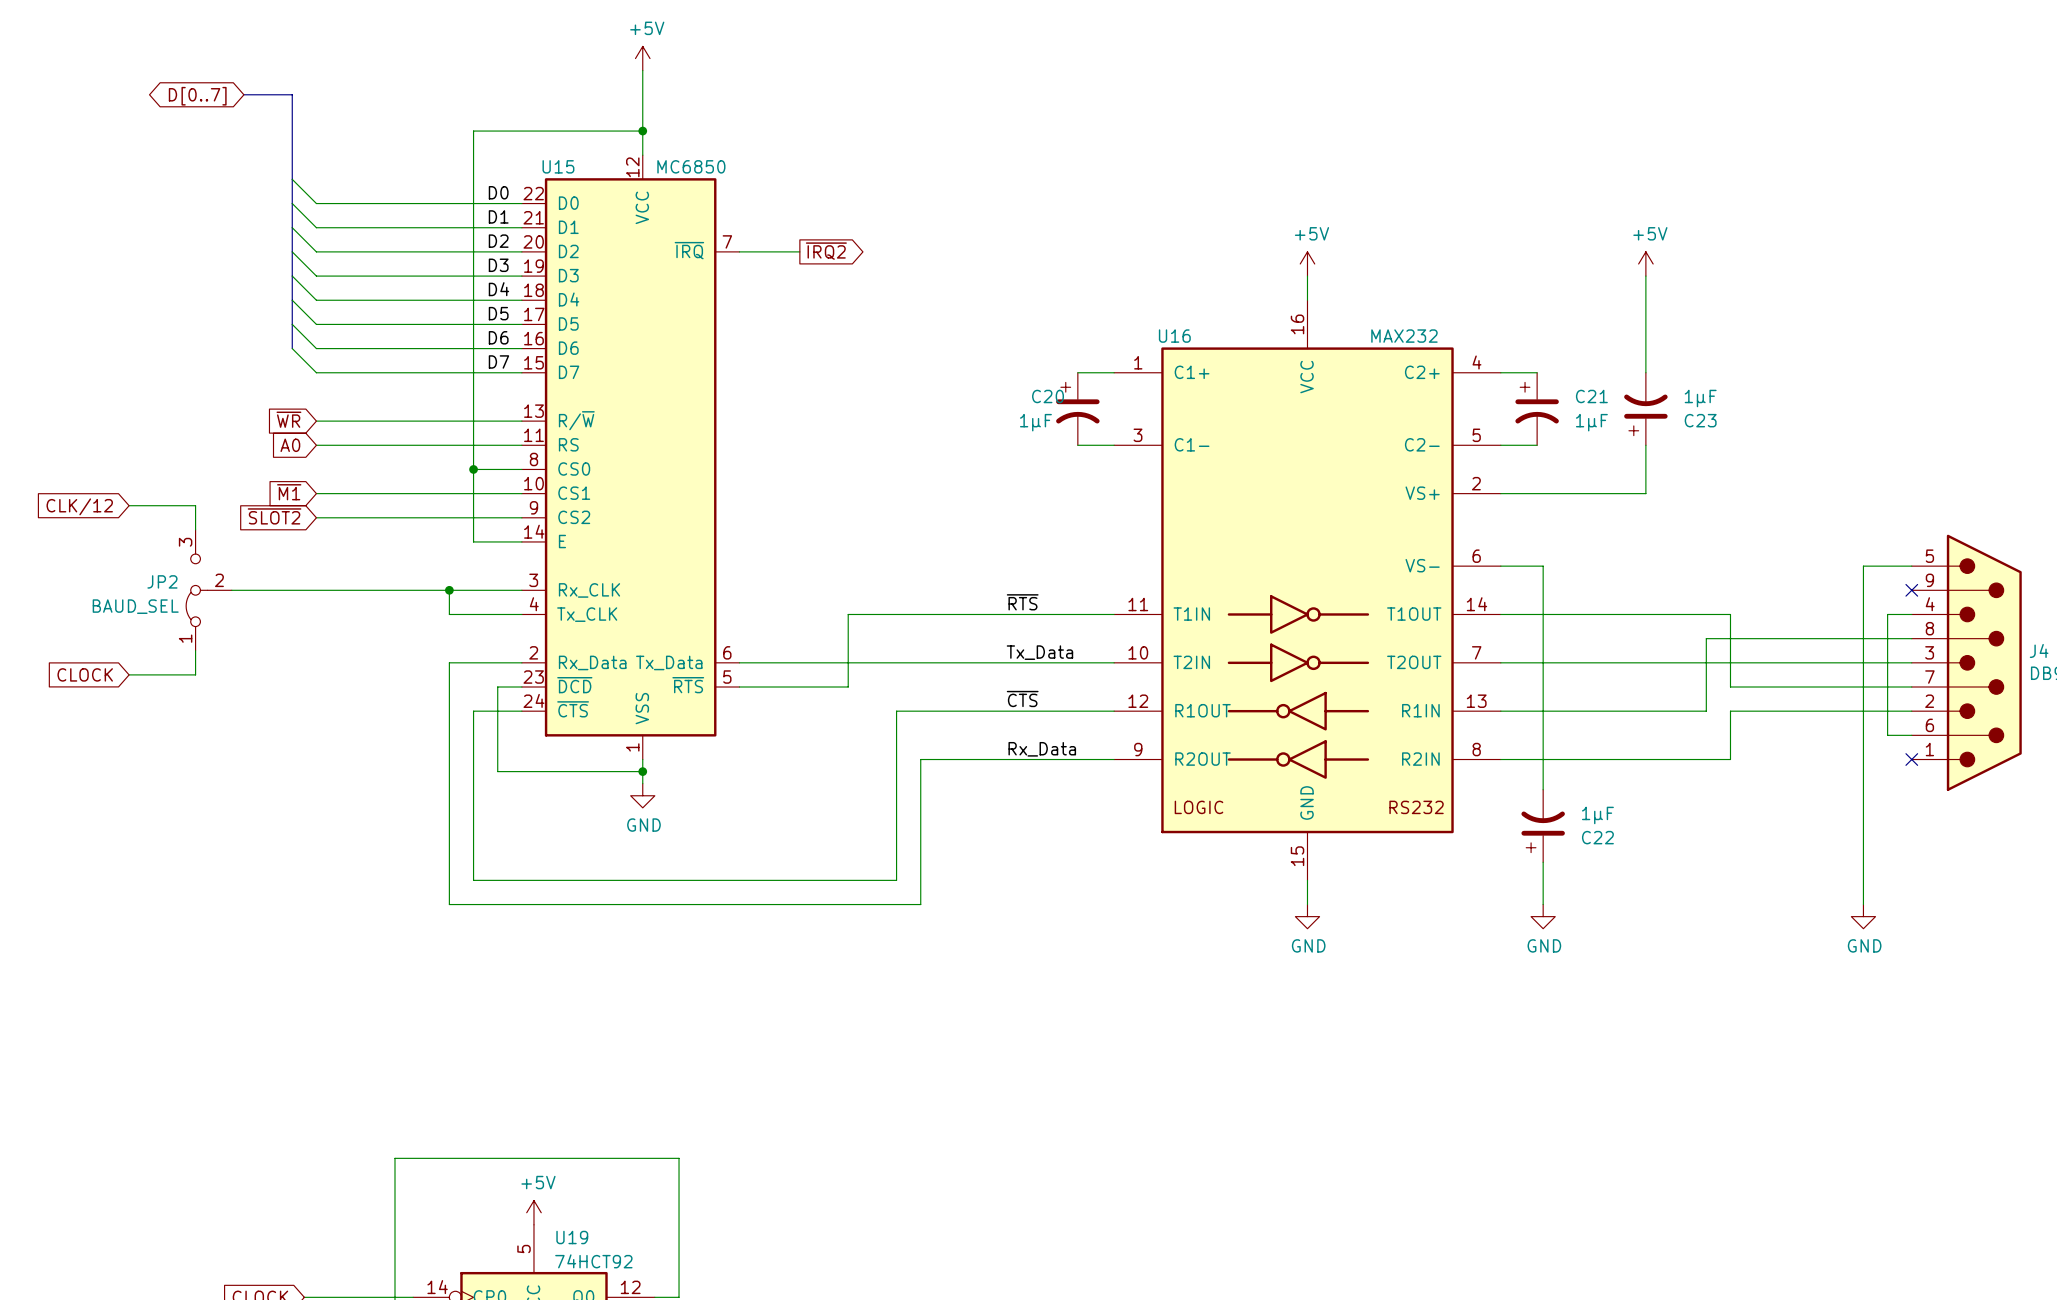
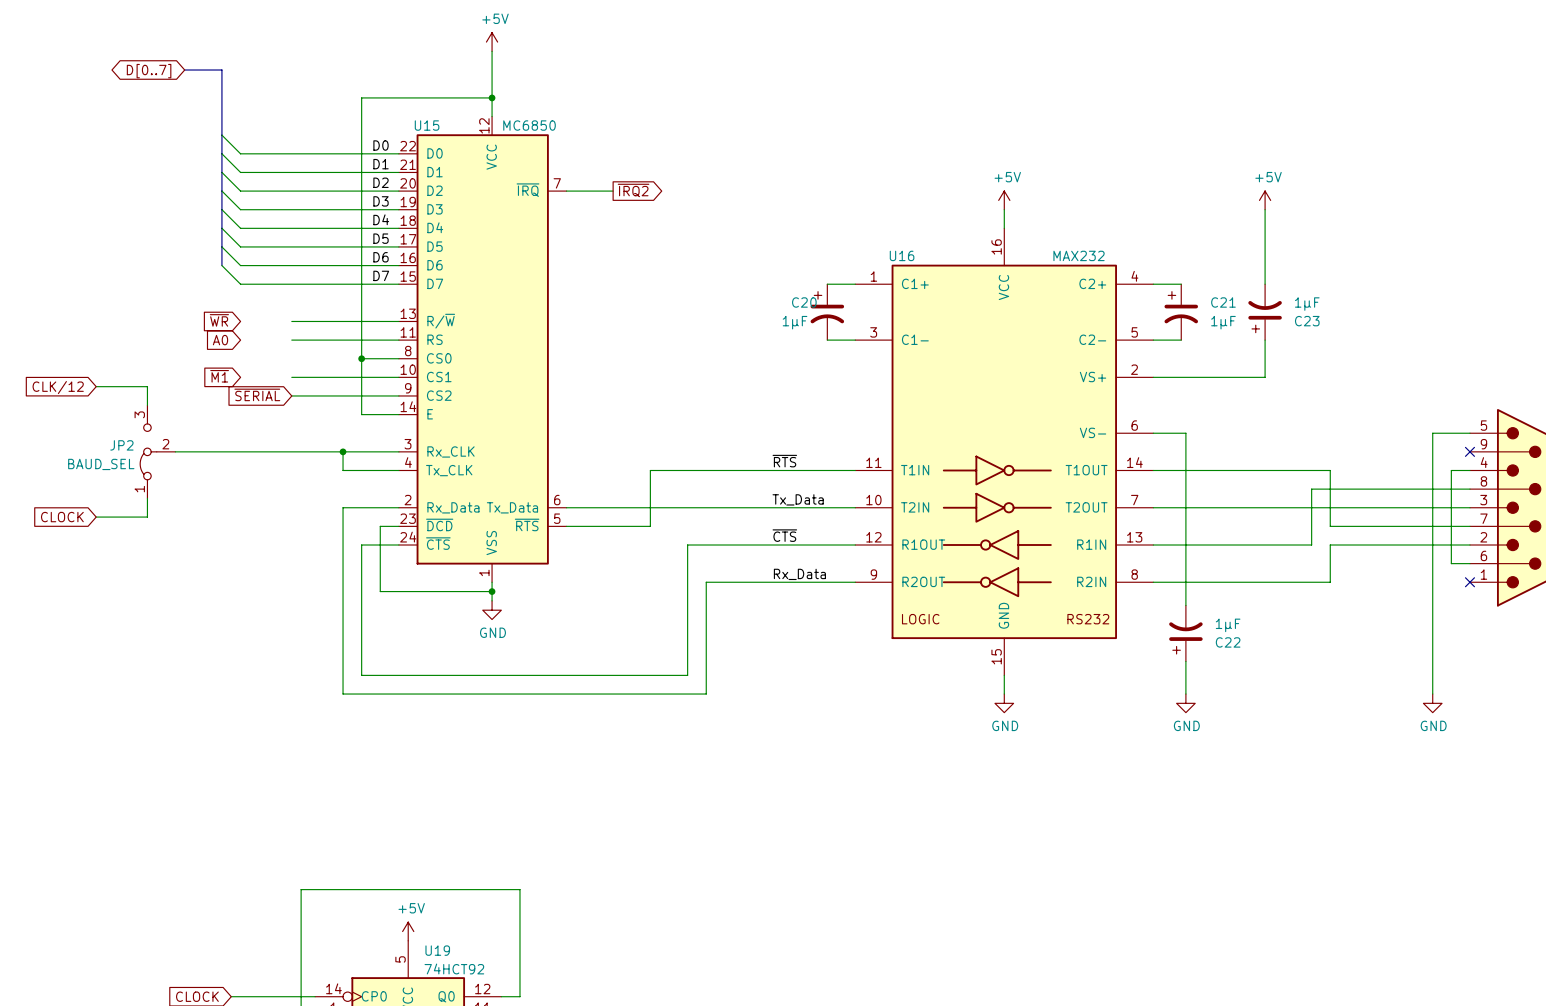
wire: (316, 421) (382, 421) -> none
wire: (316, 445) (382, 445) -> none
wire: (316, 493) (382, 493) -> none
global label: ~{SLOT2} (274, 516) -> none
global label: none -> ~{SERIAL} (257, 394)
wire: (316, 517) (382, 517) -> none

